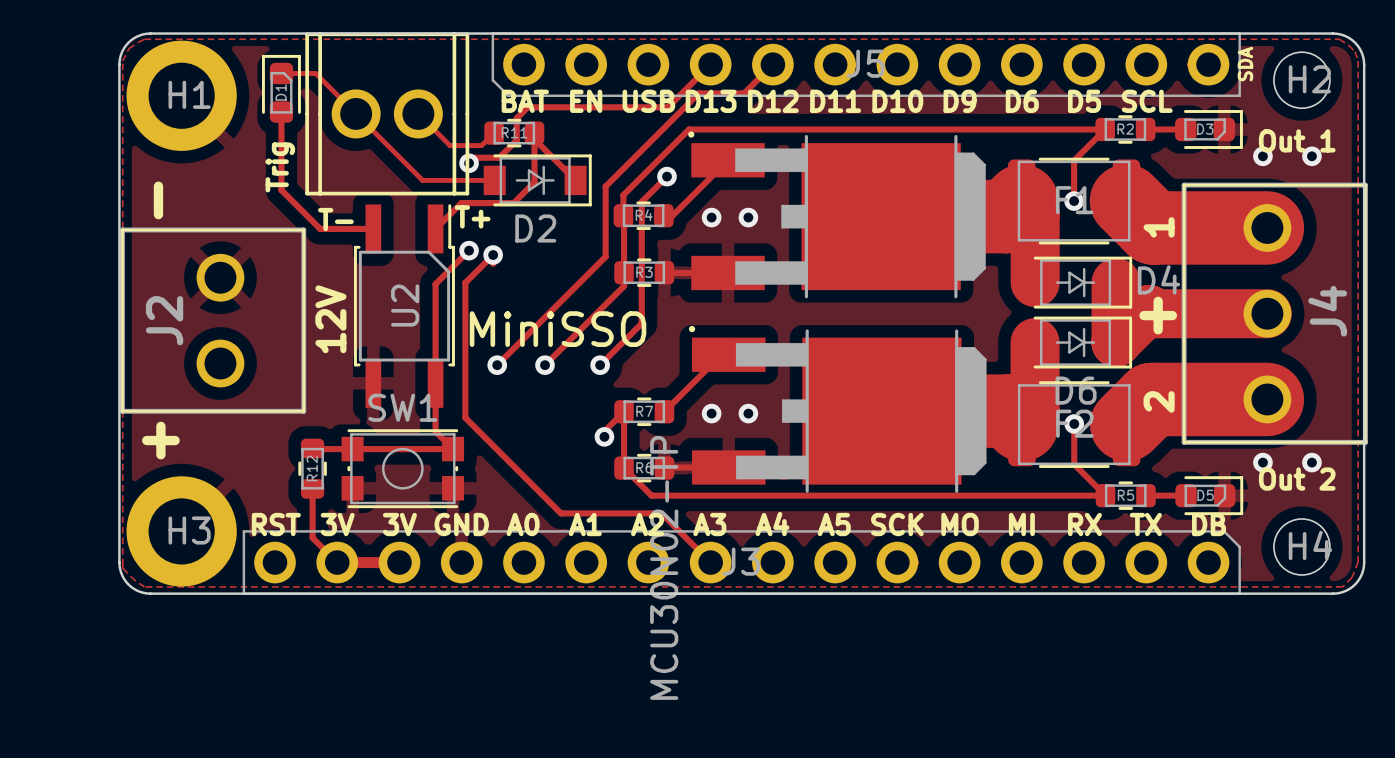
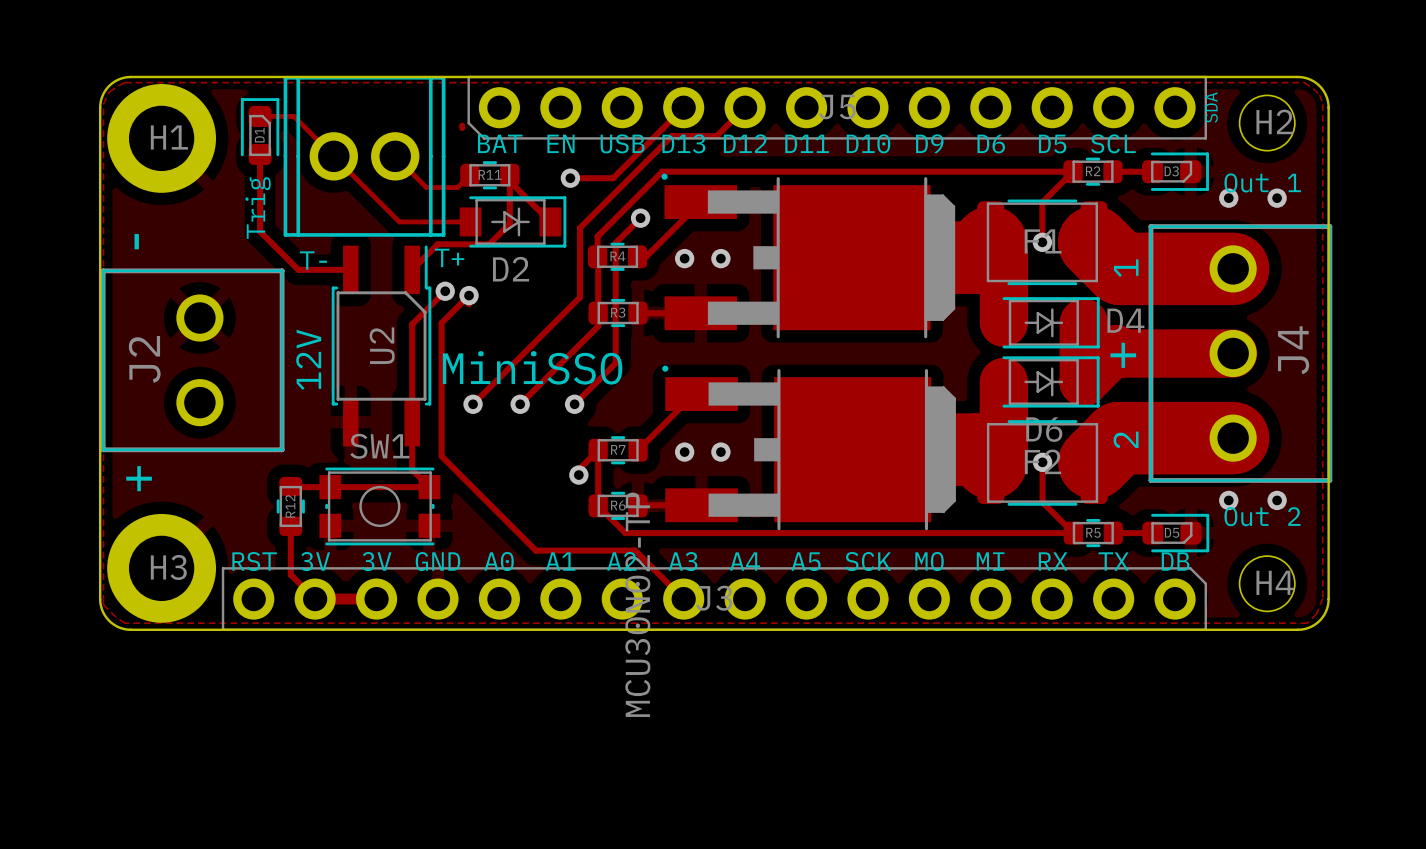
track: none -> (462, 125) (462, 128)
track: (668, 107) (527, 107) (516, 118) (516, 140) (499, 157) (474, 157) (469, 163) -> (641, 149) (613, 178) (570, 178)
via position: (469, 163) -> (570, 178)

